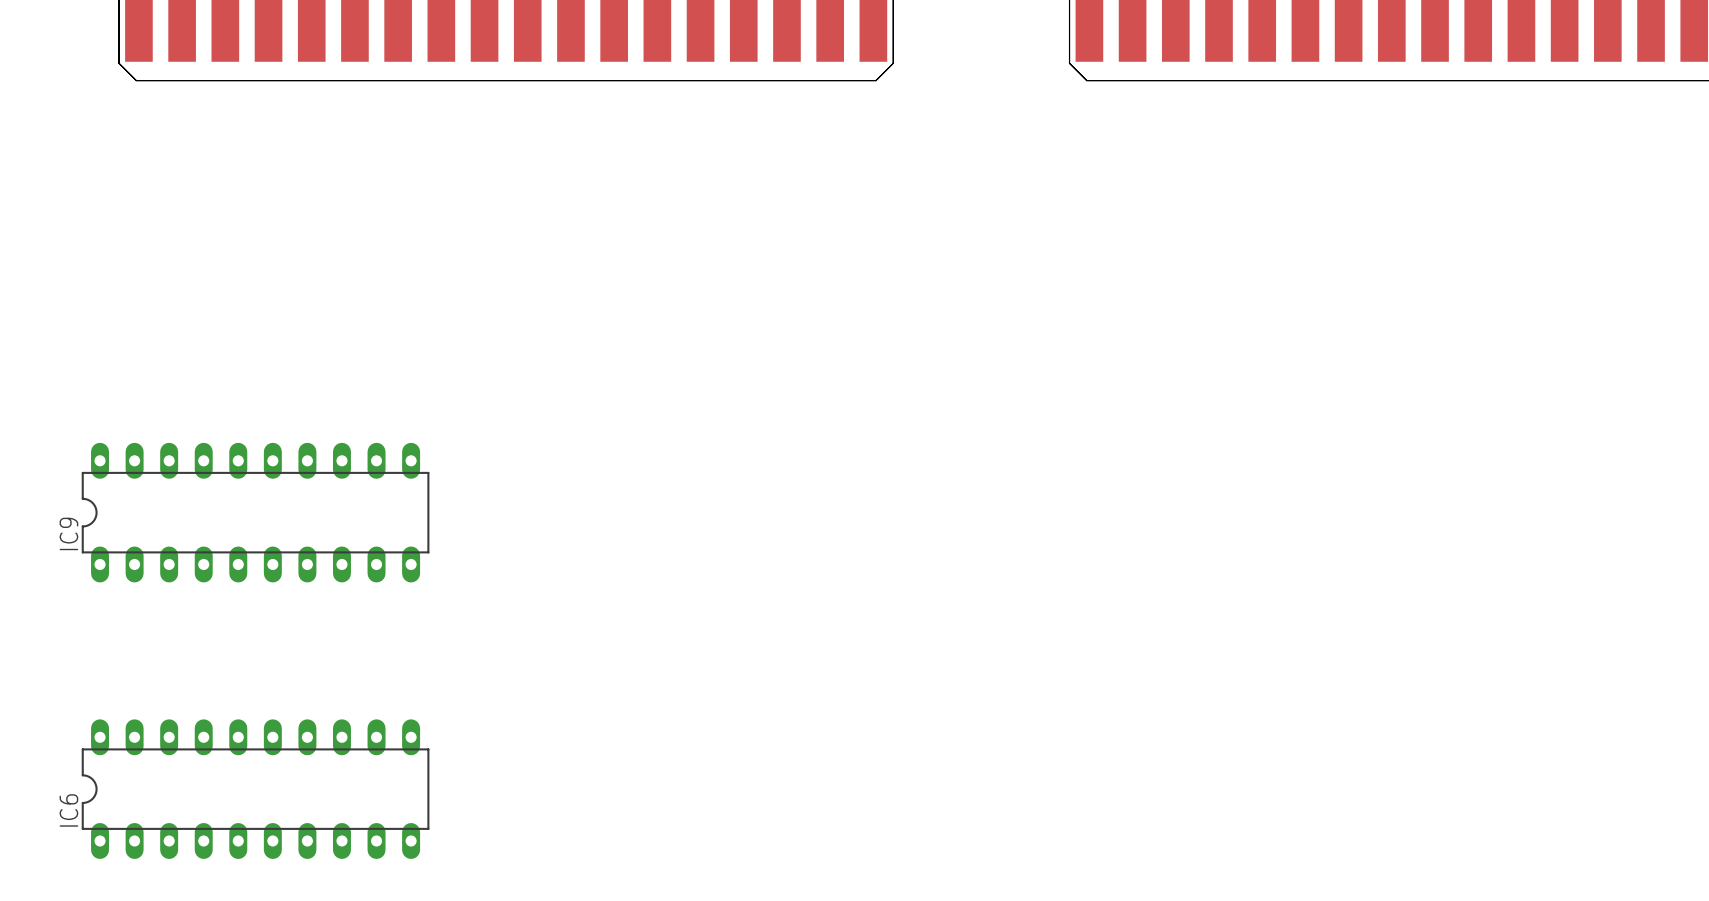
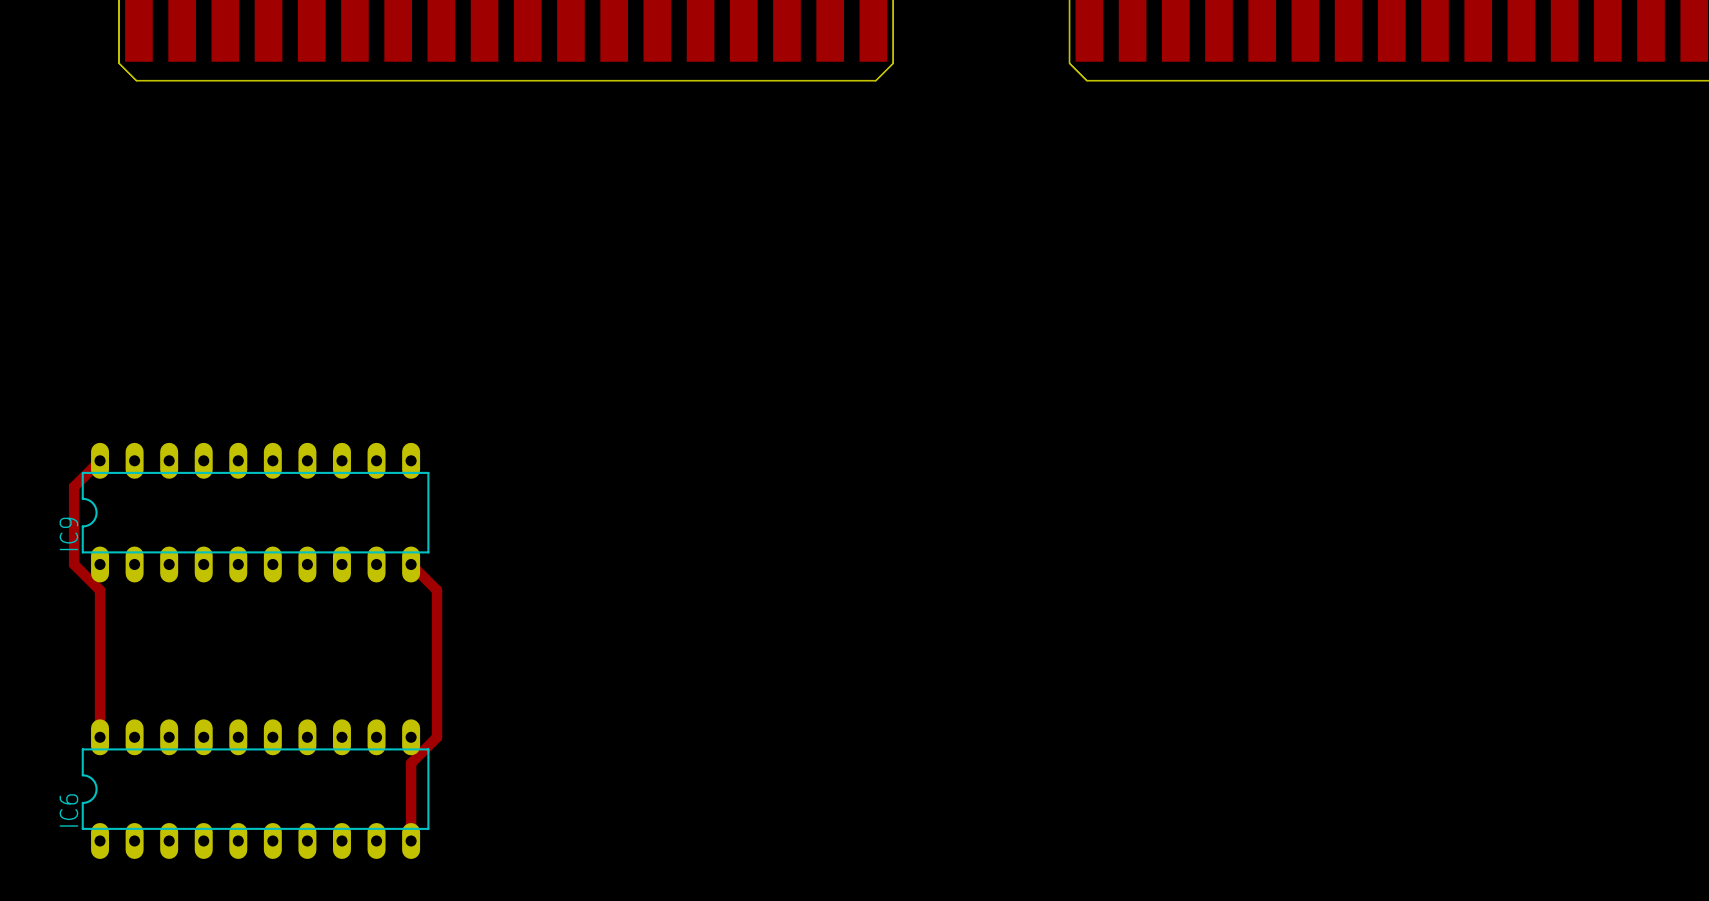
track: none -> (100, 460) (74, 486) (74, 564) (100, 590) (100, 737)
track: none -> (411, 564) (437, 590) (437, 737) (411, 763) (411, 840)

